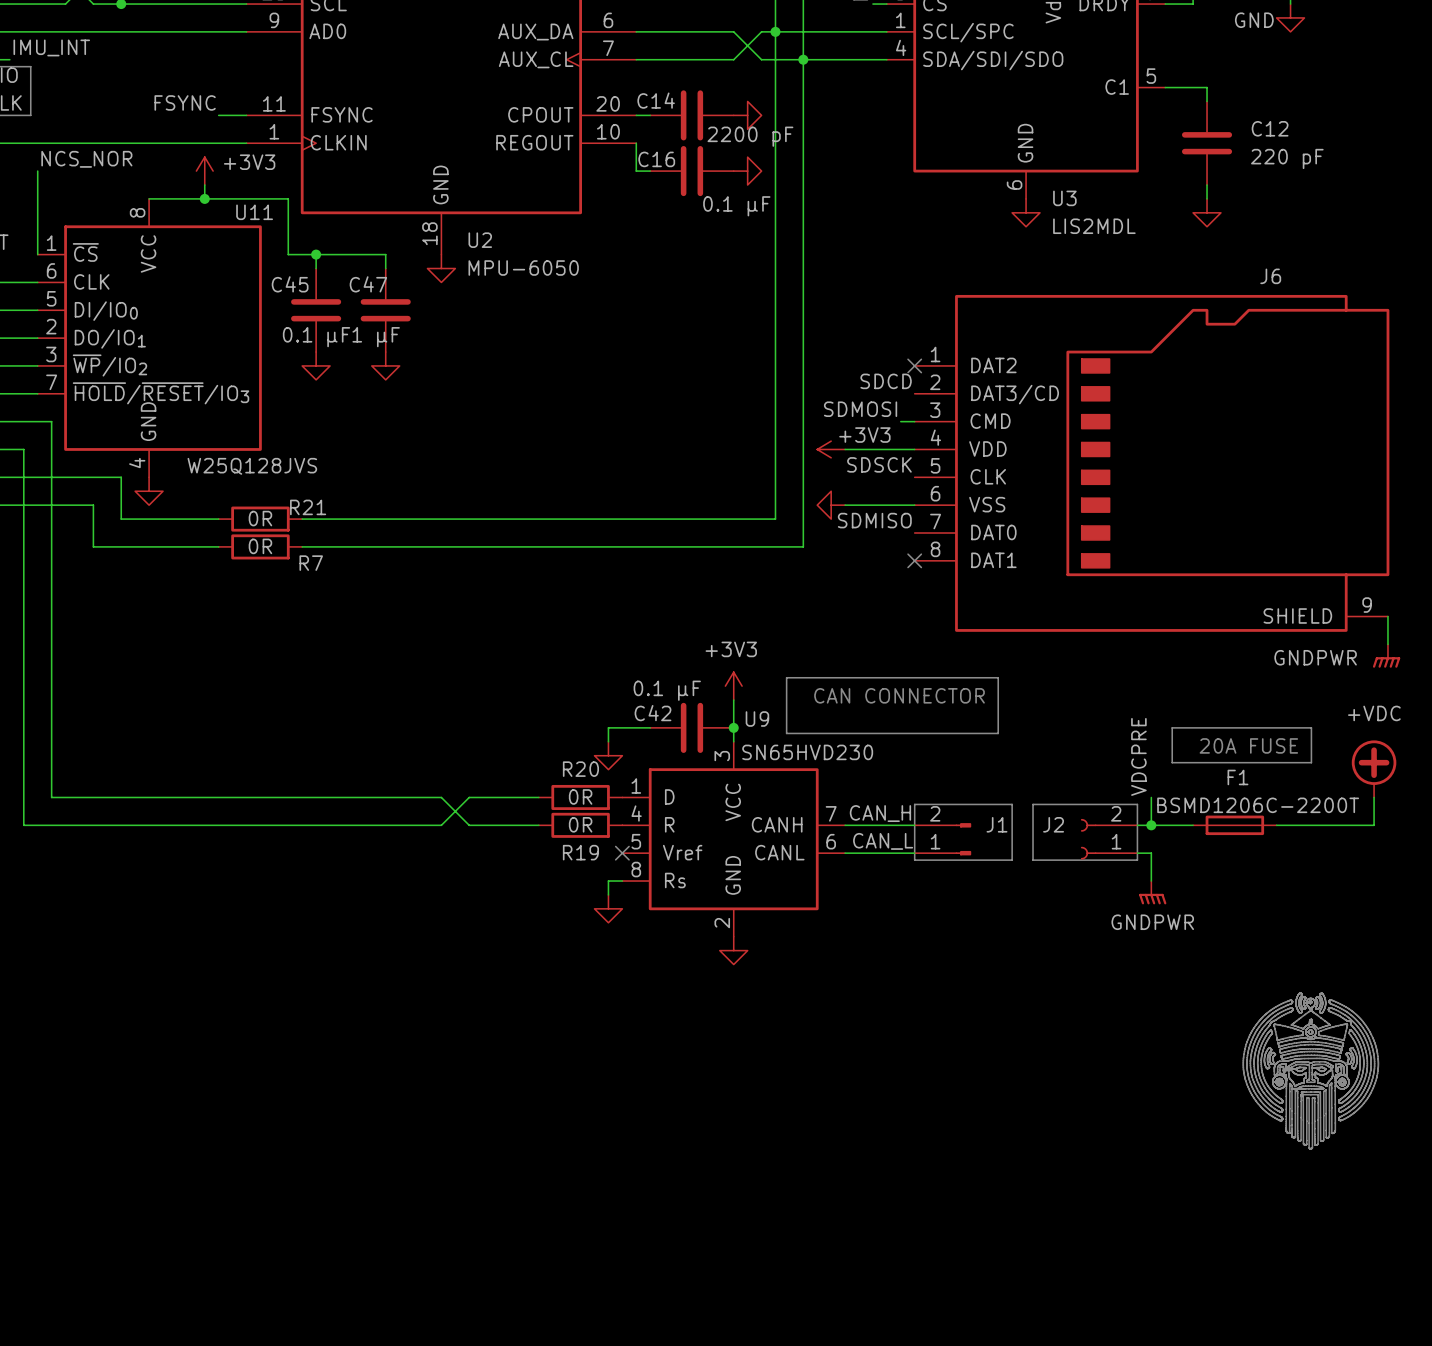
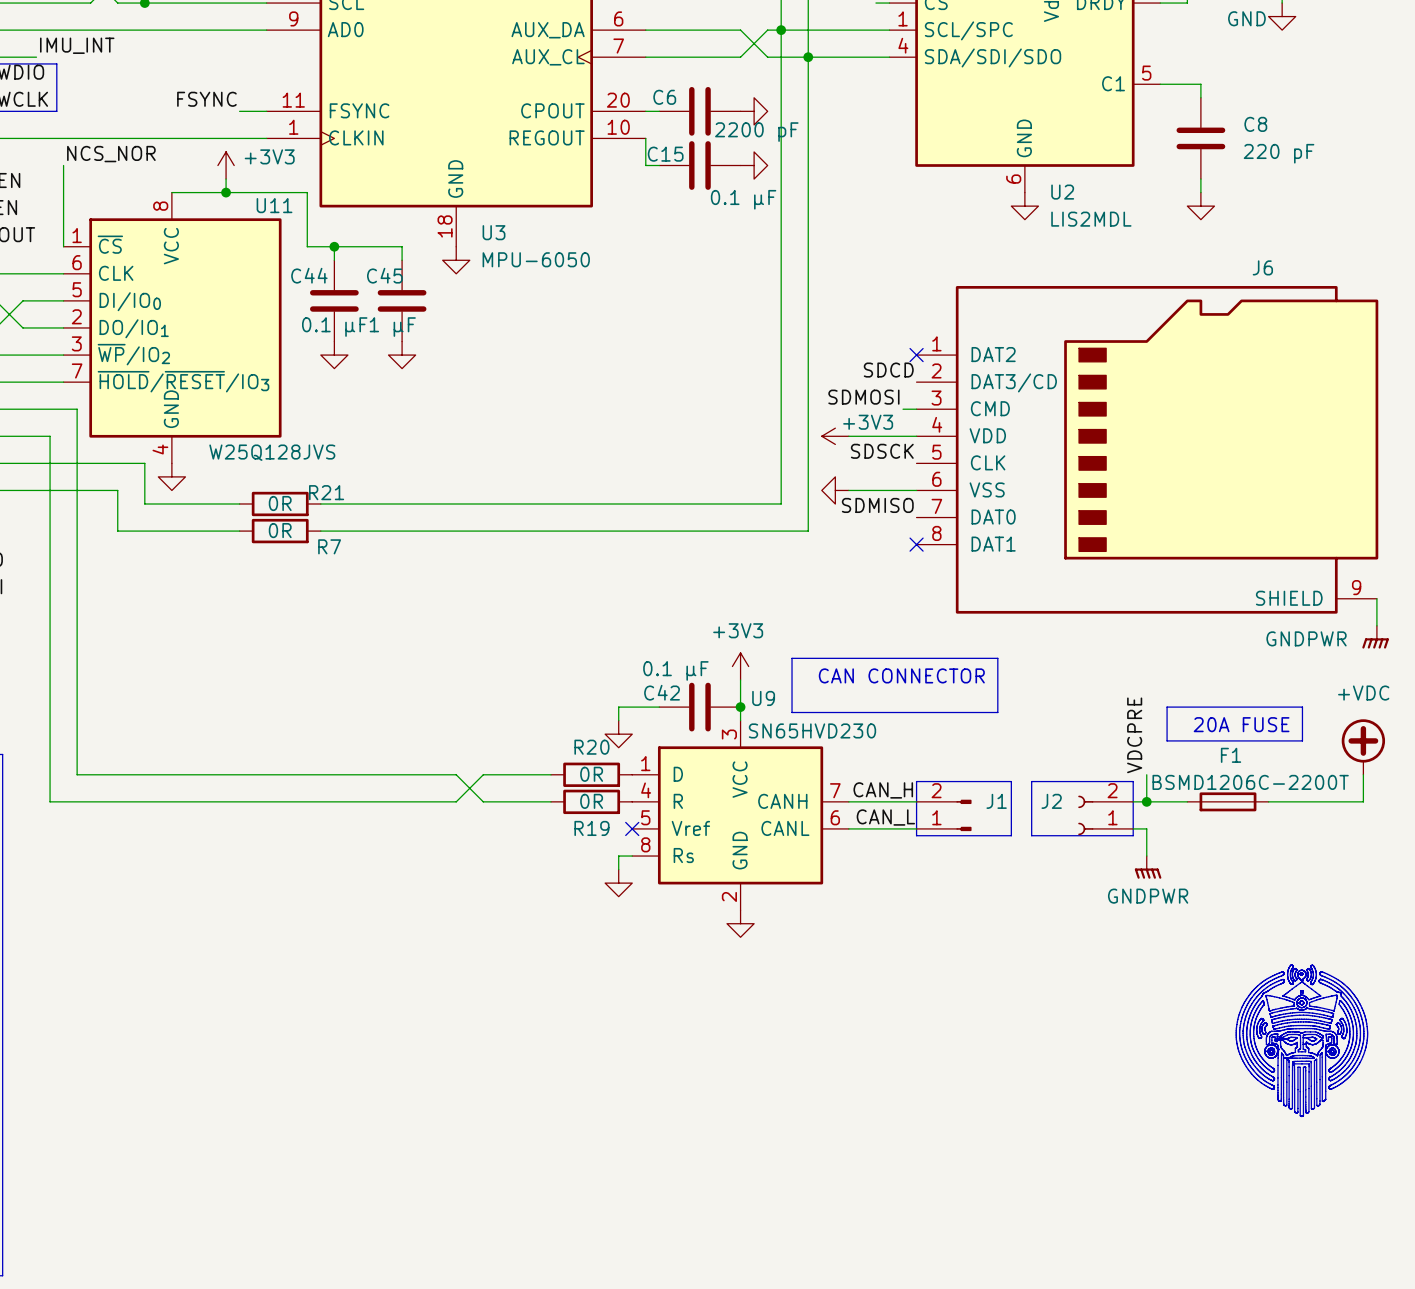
C14 name: C14 (656, 100) -> C6 (664, 97)
C12 name: C12 (1270, 128) -> C8 (1255, 124)
C16 name: C16 (656, 159) -> C15 (665, 154)
U3 name: U3 (1064, 198) -> U2 (1062, 192)
U2 name: U2 (480, 240) -> U3 (494, 232)
C45 name: C45 (290, 284) -> C44 (309, 275)
C47 name: C47 (368, 284) -> C45 (384, 275)

